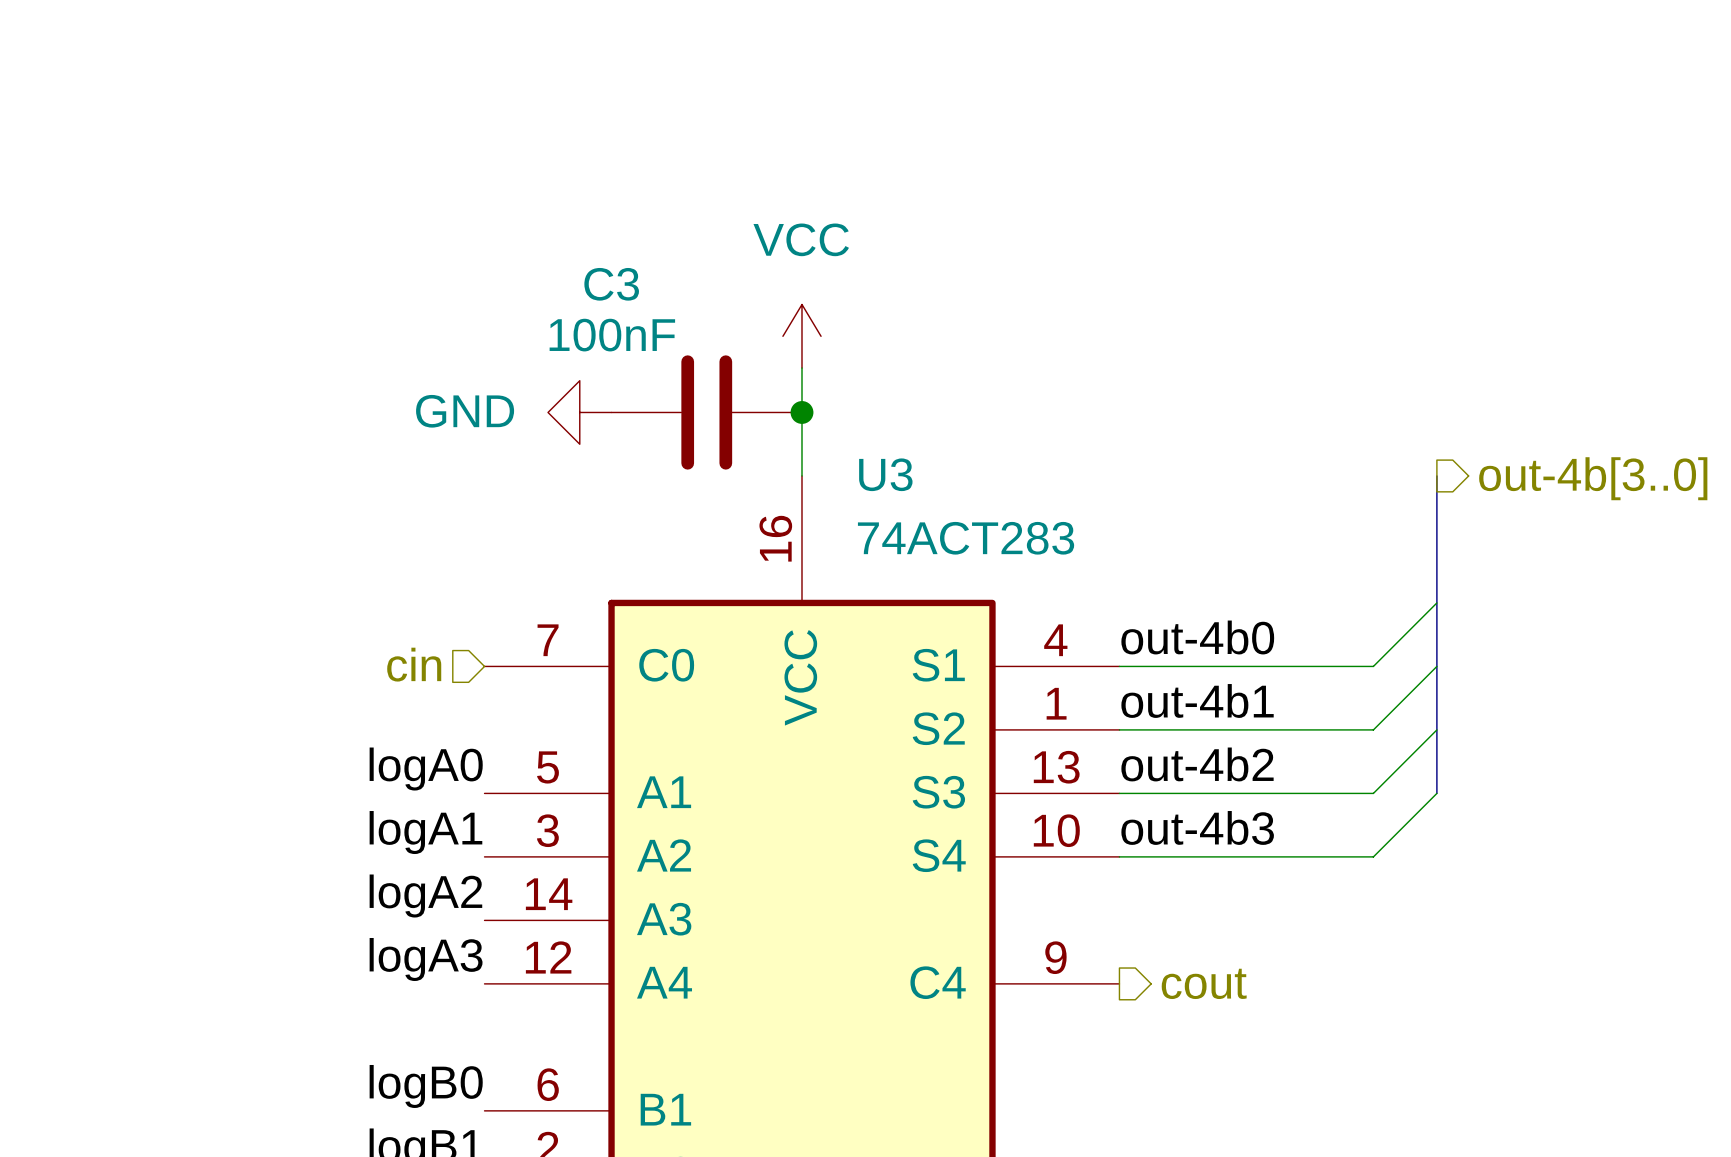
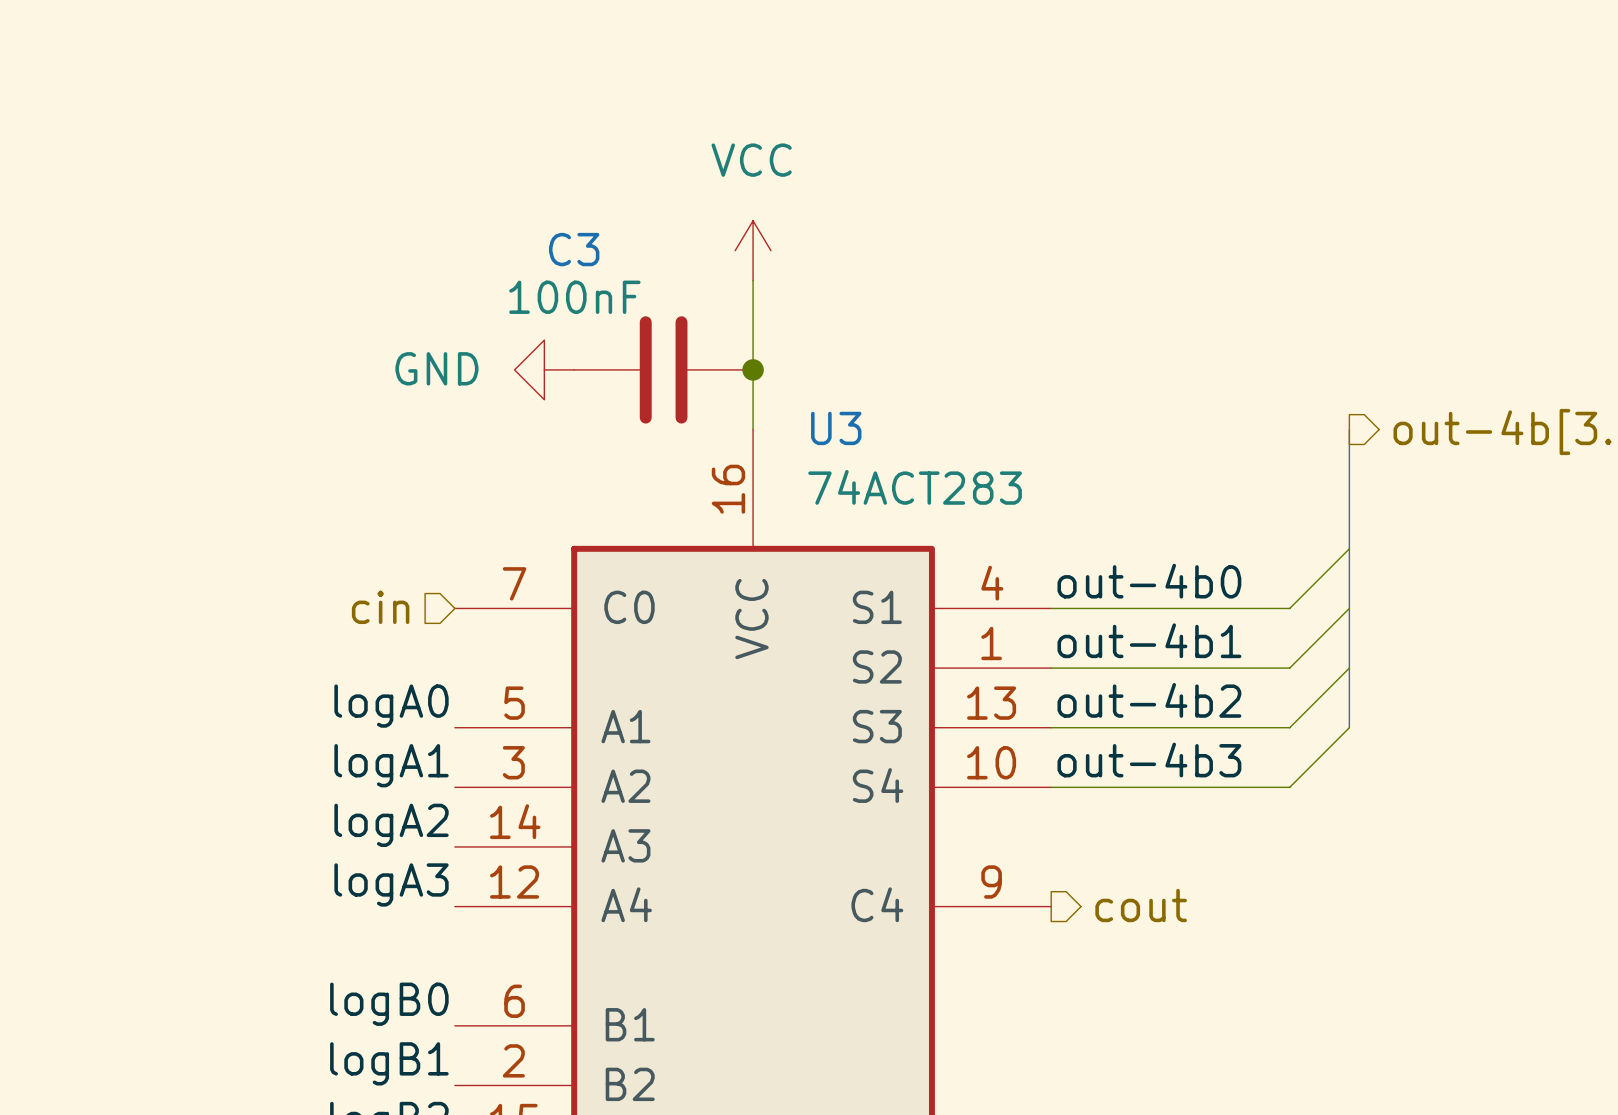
power symbol position: VCC (801, 336) -> VCC (753, 250)

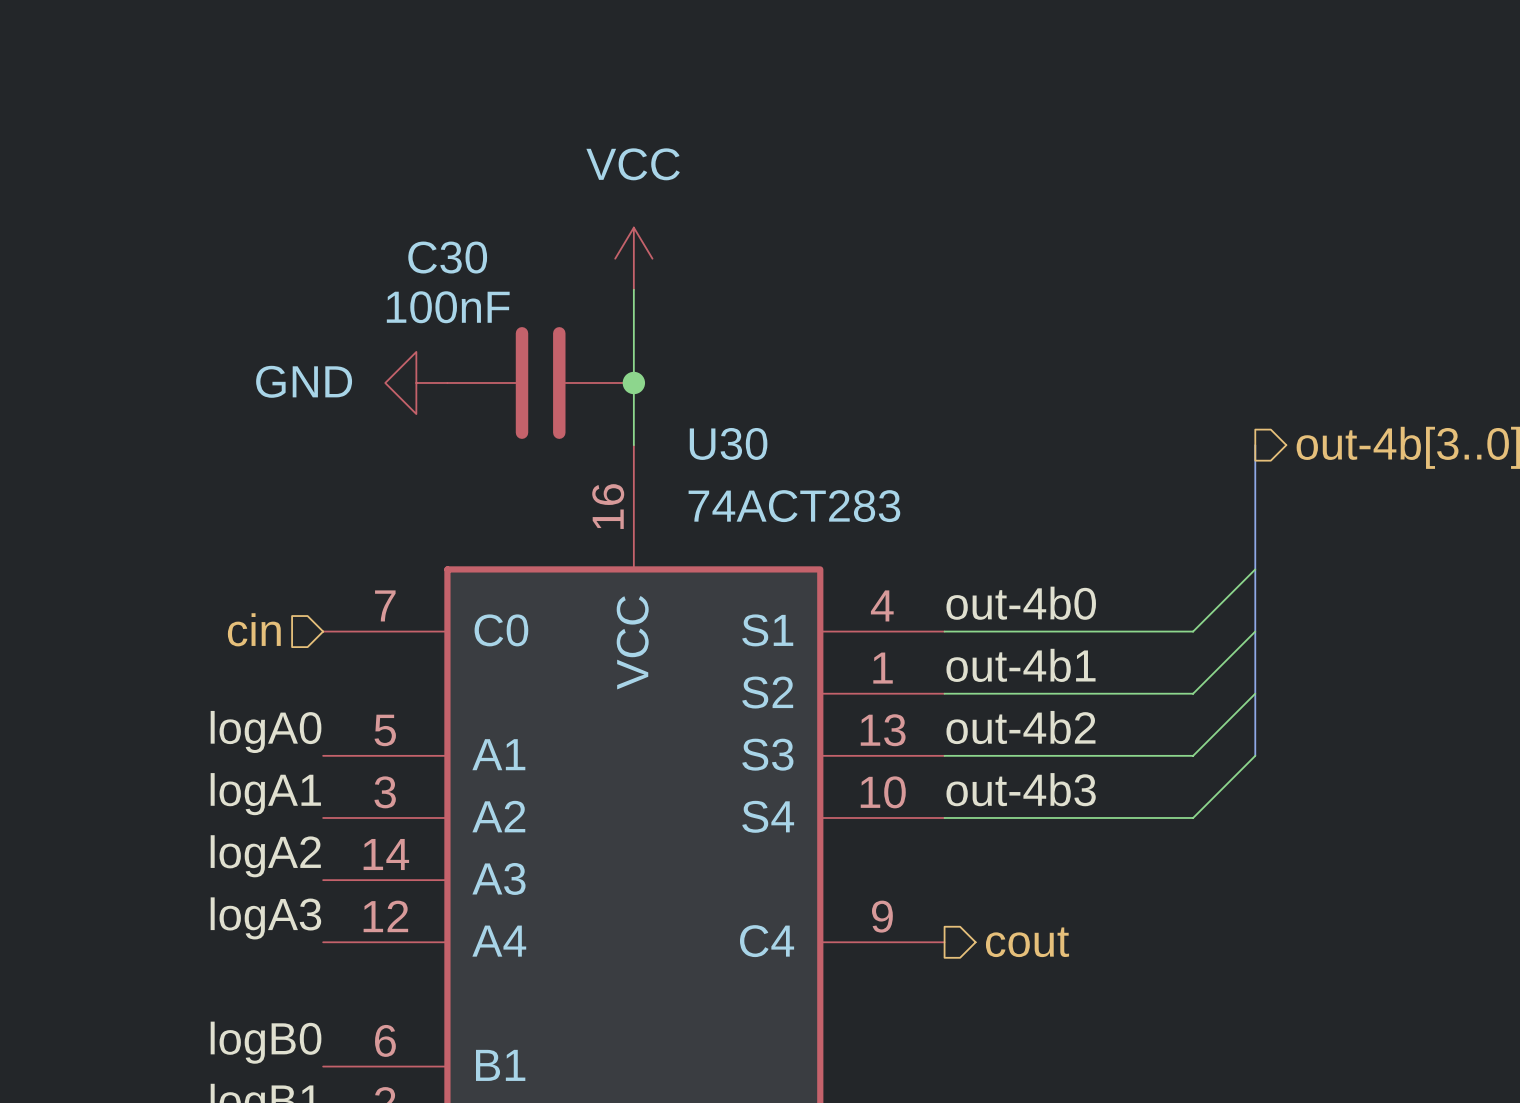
C3 name: C3 (574, 249) -> C30 (447, 257)
U3 name: U3 (836, 428) -> U30 (728, 443)

